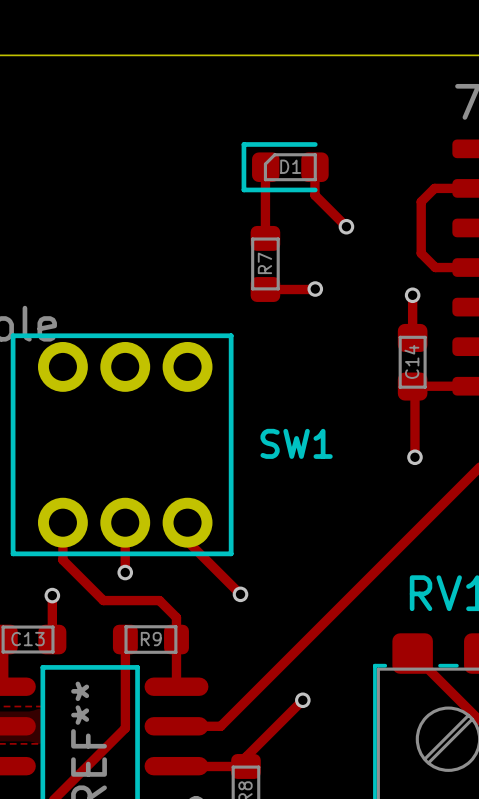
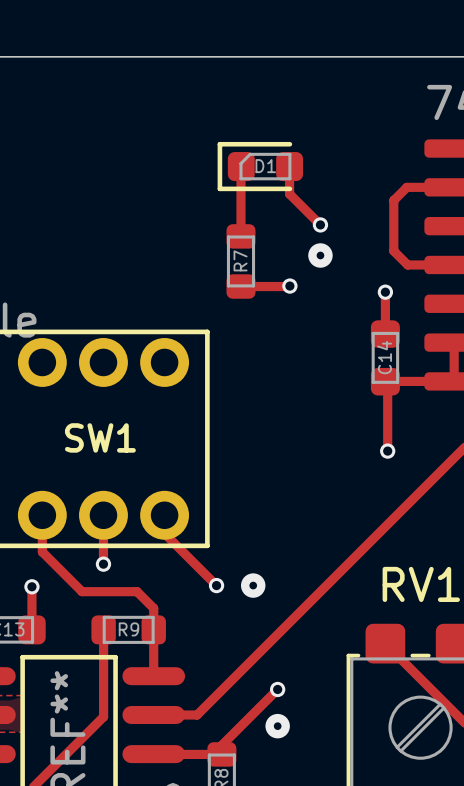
via: none -> (320, 255)
SW1 name position: SW1 (296, 443) -> SW1 (100, 437)
via: none -> (253, 585)
via: none -> (277, 726)

